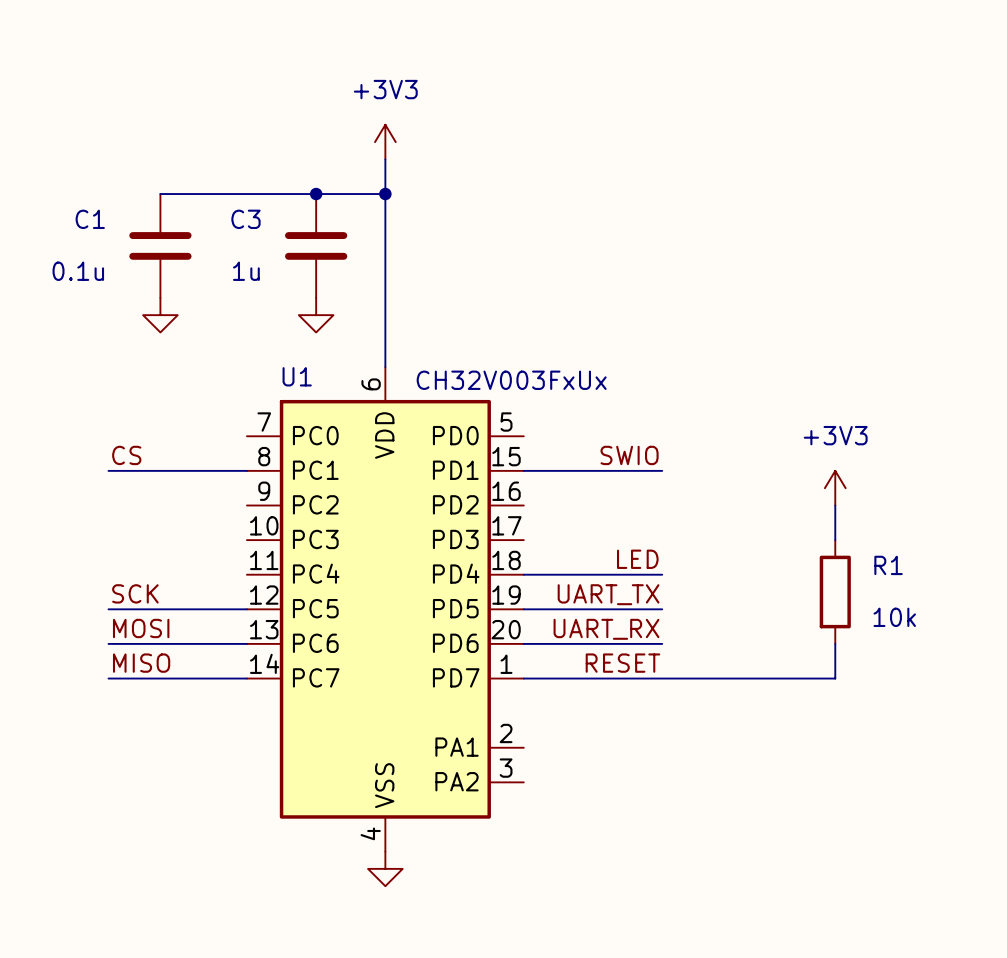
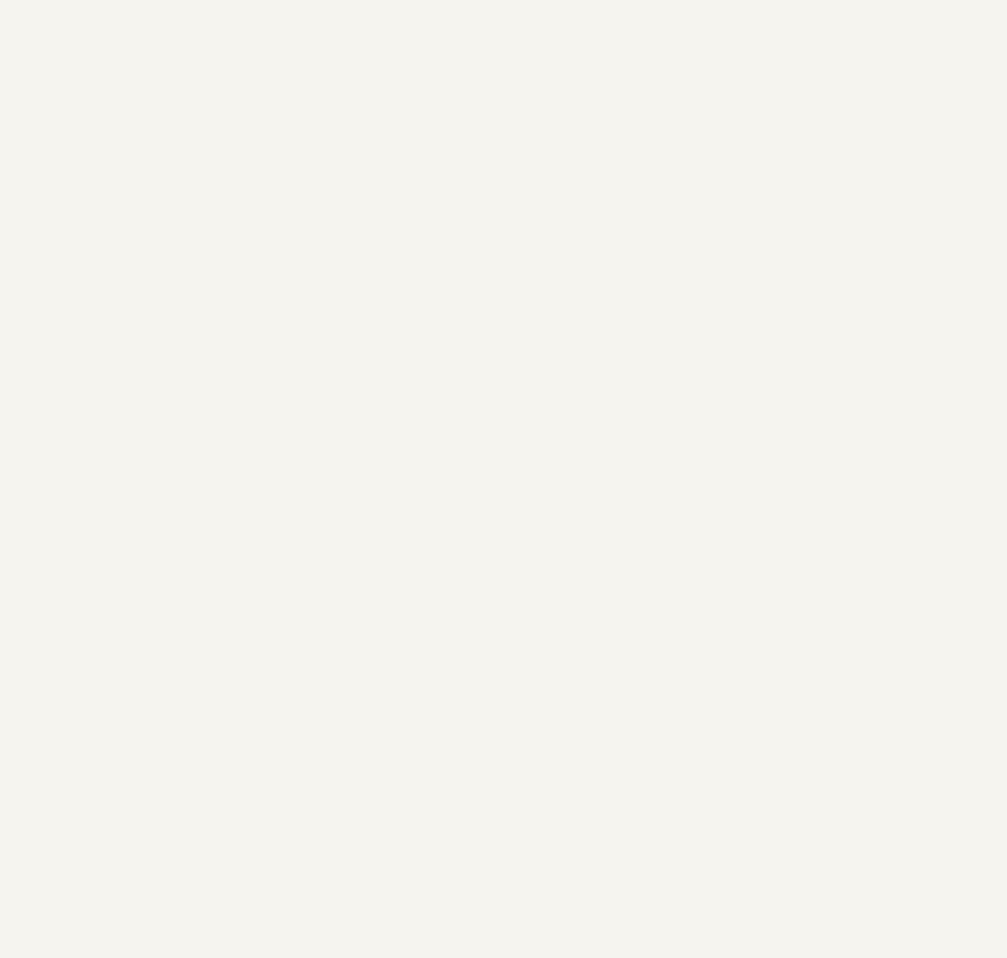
power symbol: +3V3 (385, 142) -> none
wire: (385, 159) (385, 367) -> none
wire: (160, 194) (385, 194) -> none
junction: (316, 194) -> none
junction: (385, 194) -> none
C1: 0.1u (160, 245) -> none
C3: 1u (316, 245) -> none
power symbol: (160, 315) -> none
power symbol: (316, 315) -> none
label: CS (126, 455) -> none
label: SWIO (629, 455) -> none
wire: (108, 470) (246, 470) -> none
wire: (523, 470) (662, 470) -> none
power symbol: +3V3 (835, 488) -> none
wire: (835, 505) (835, 540) -> none
label: LED (637, 559) -> none
wire: (523, 574) (662, 574) -> none
R1: 10k (835, 592) -> none
label: SCK (135, 593) -> none
label: UART_TX (608, 594) -> none
wire: (108, 609) (246, 609) -> none
U1: CH32V003FxUx (385, 609) -> none
wire: (523, 609) (662, 609) -> none
label: MOSI (141, 628) -> none
label: UART_RX (606, 629) -> none
wire: (108, 643) (246, 643) -> none
wire: (523, 643) (662, 643) -> none
wire: (835, 643) (835, 678) (523, 678) -> none
label: MISO (141, 663) -> none
label: RESET (622, 663) -> none
wire: (108, 678) (246, 678) -> none
power symbol: (385, 868) -> none

